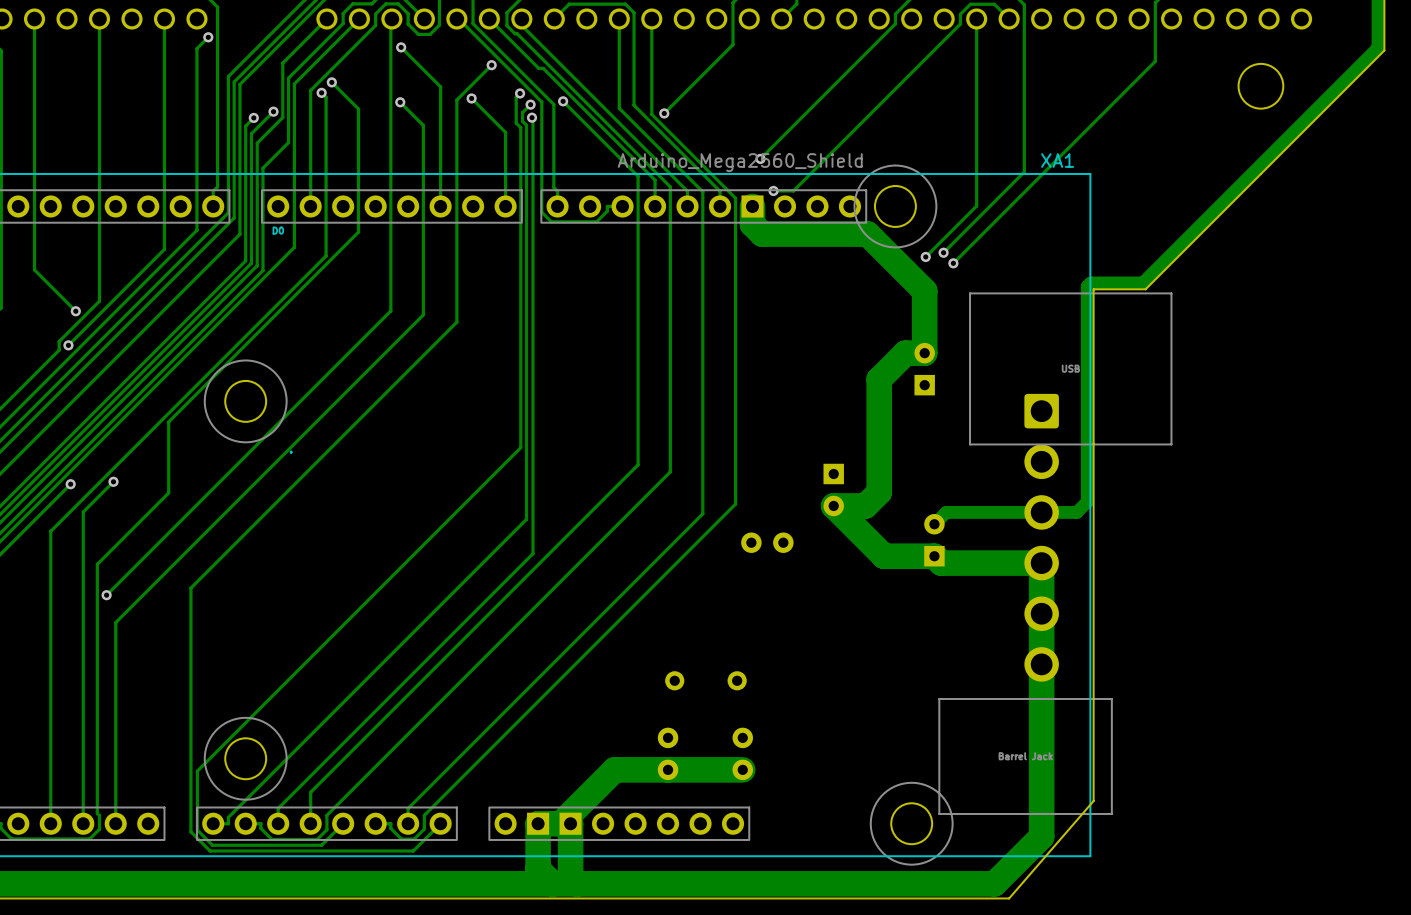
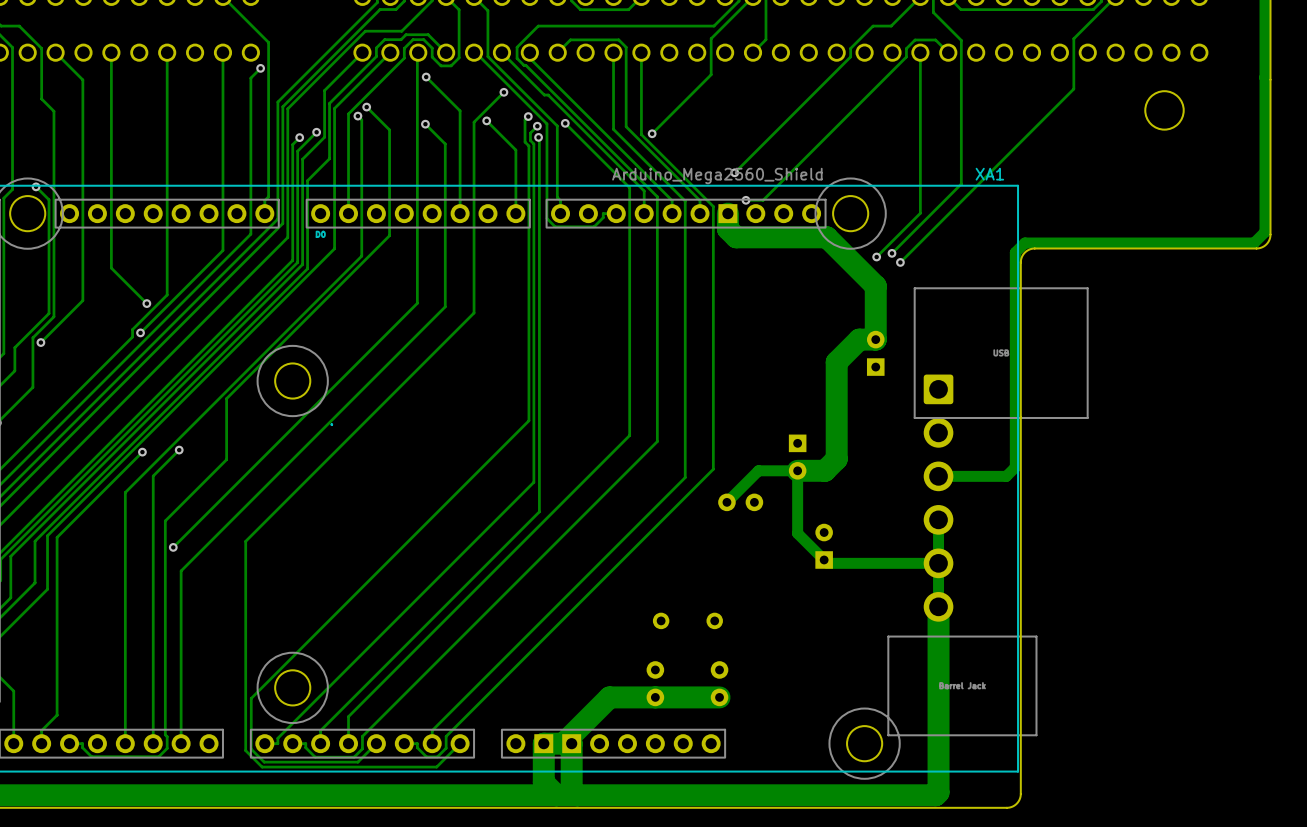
track: (1377, 47) (1142, 282) (1090, 282) (1087, 286) -> (1265, 77) (1265, 232) (1254, 243) (1024, 243) (1015, 252) (1015, 282)
board edge: (1384, 50) (1145, 289) (1093, 289) -> (1270, 79) (1270, 234) (1265, 245) (1256, 248) (1033, 248) (1026, 251) (1021, 257) (1020, 284)
track: (833, 505) (883, 556) (934, 556) (941, 563) (1041, 563) (1041, 836) (997, 880) -> (938, 519) (938, 792)
track: (997, 512) (946, 512) (934, 524) -> none
part position: (1041, 537) -> (938, 498)
part position: (934, 540) -> (824, 546)
track: none -> (726, 502) (758, 470) (797, 470) (797, 533) (827, 563) (938, 563)
board edge: (1093, 800) (1009, 898) -> (1020, 724) (1020, 793) (1017, 802) (1008, 807) (948, 807)

